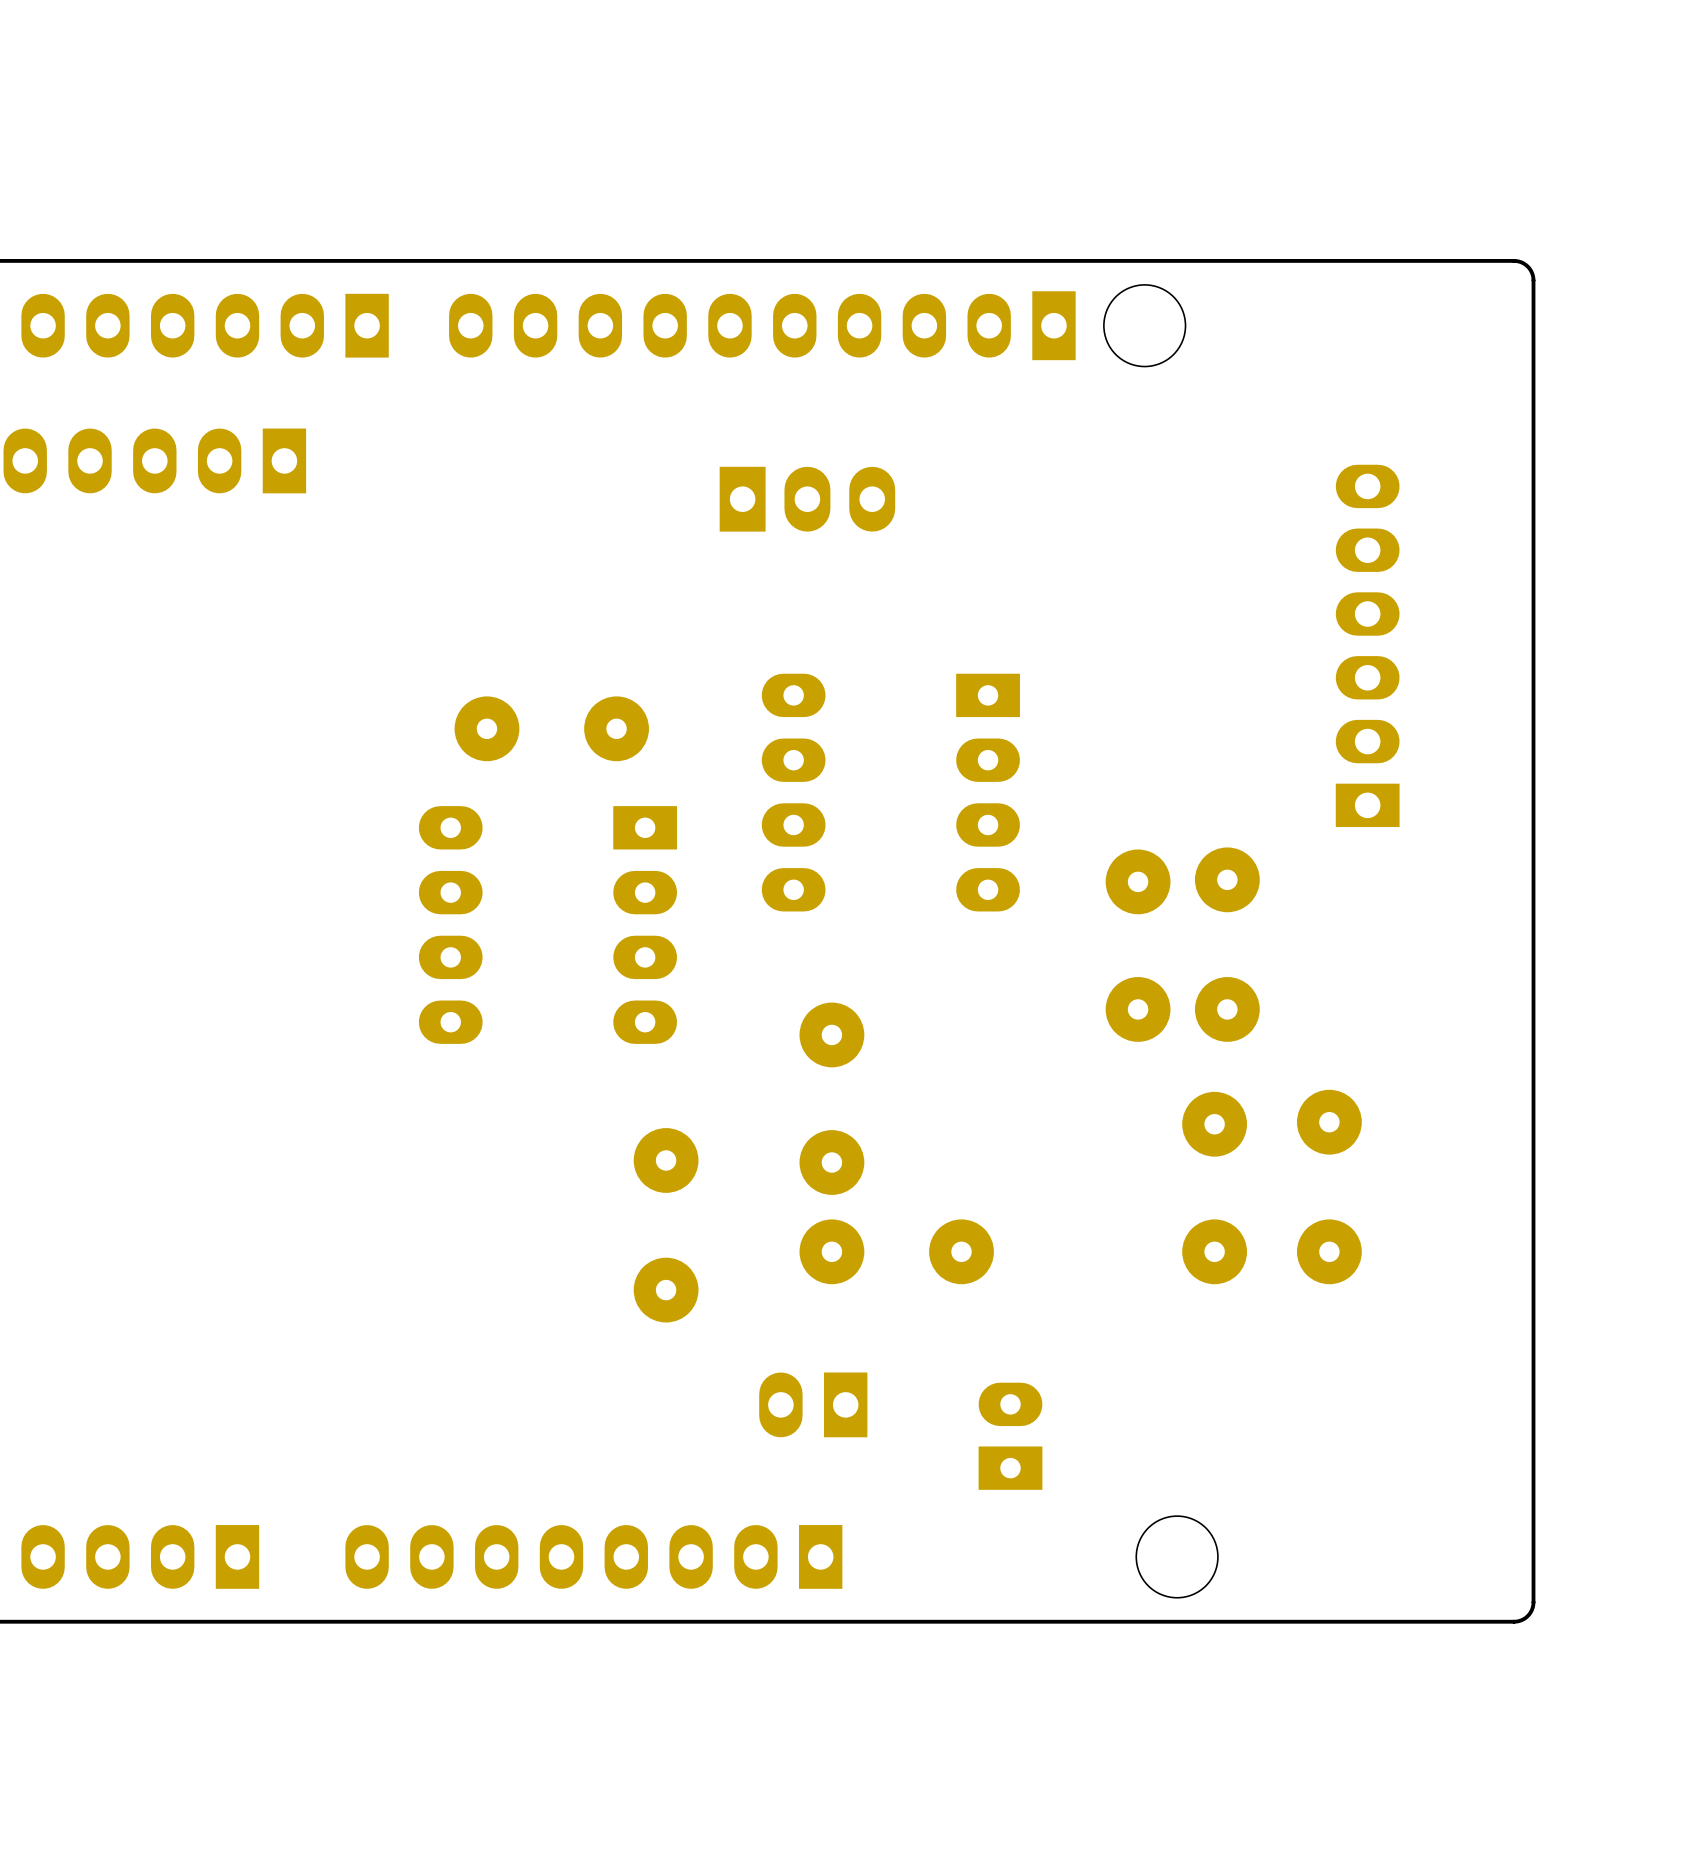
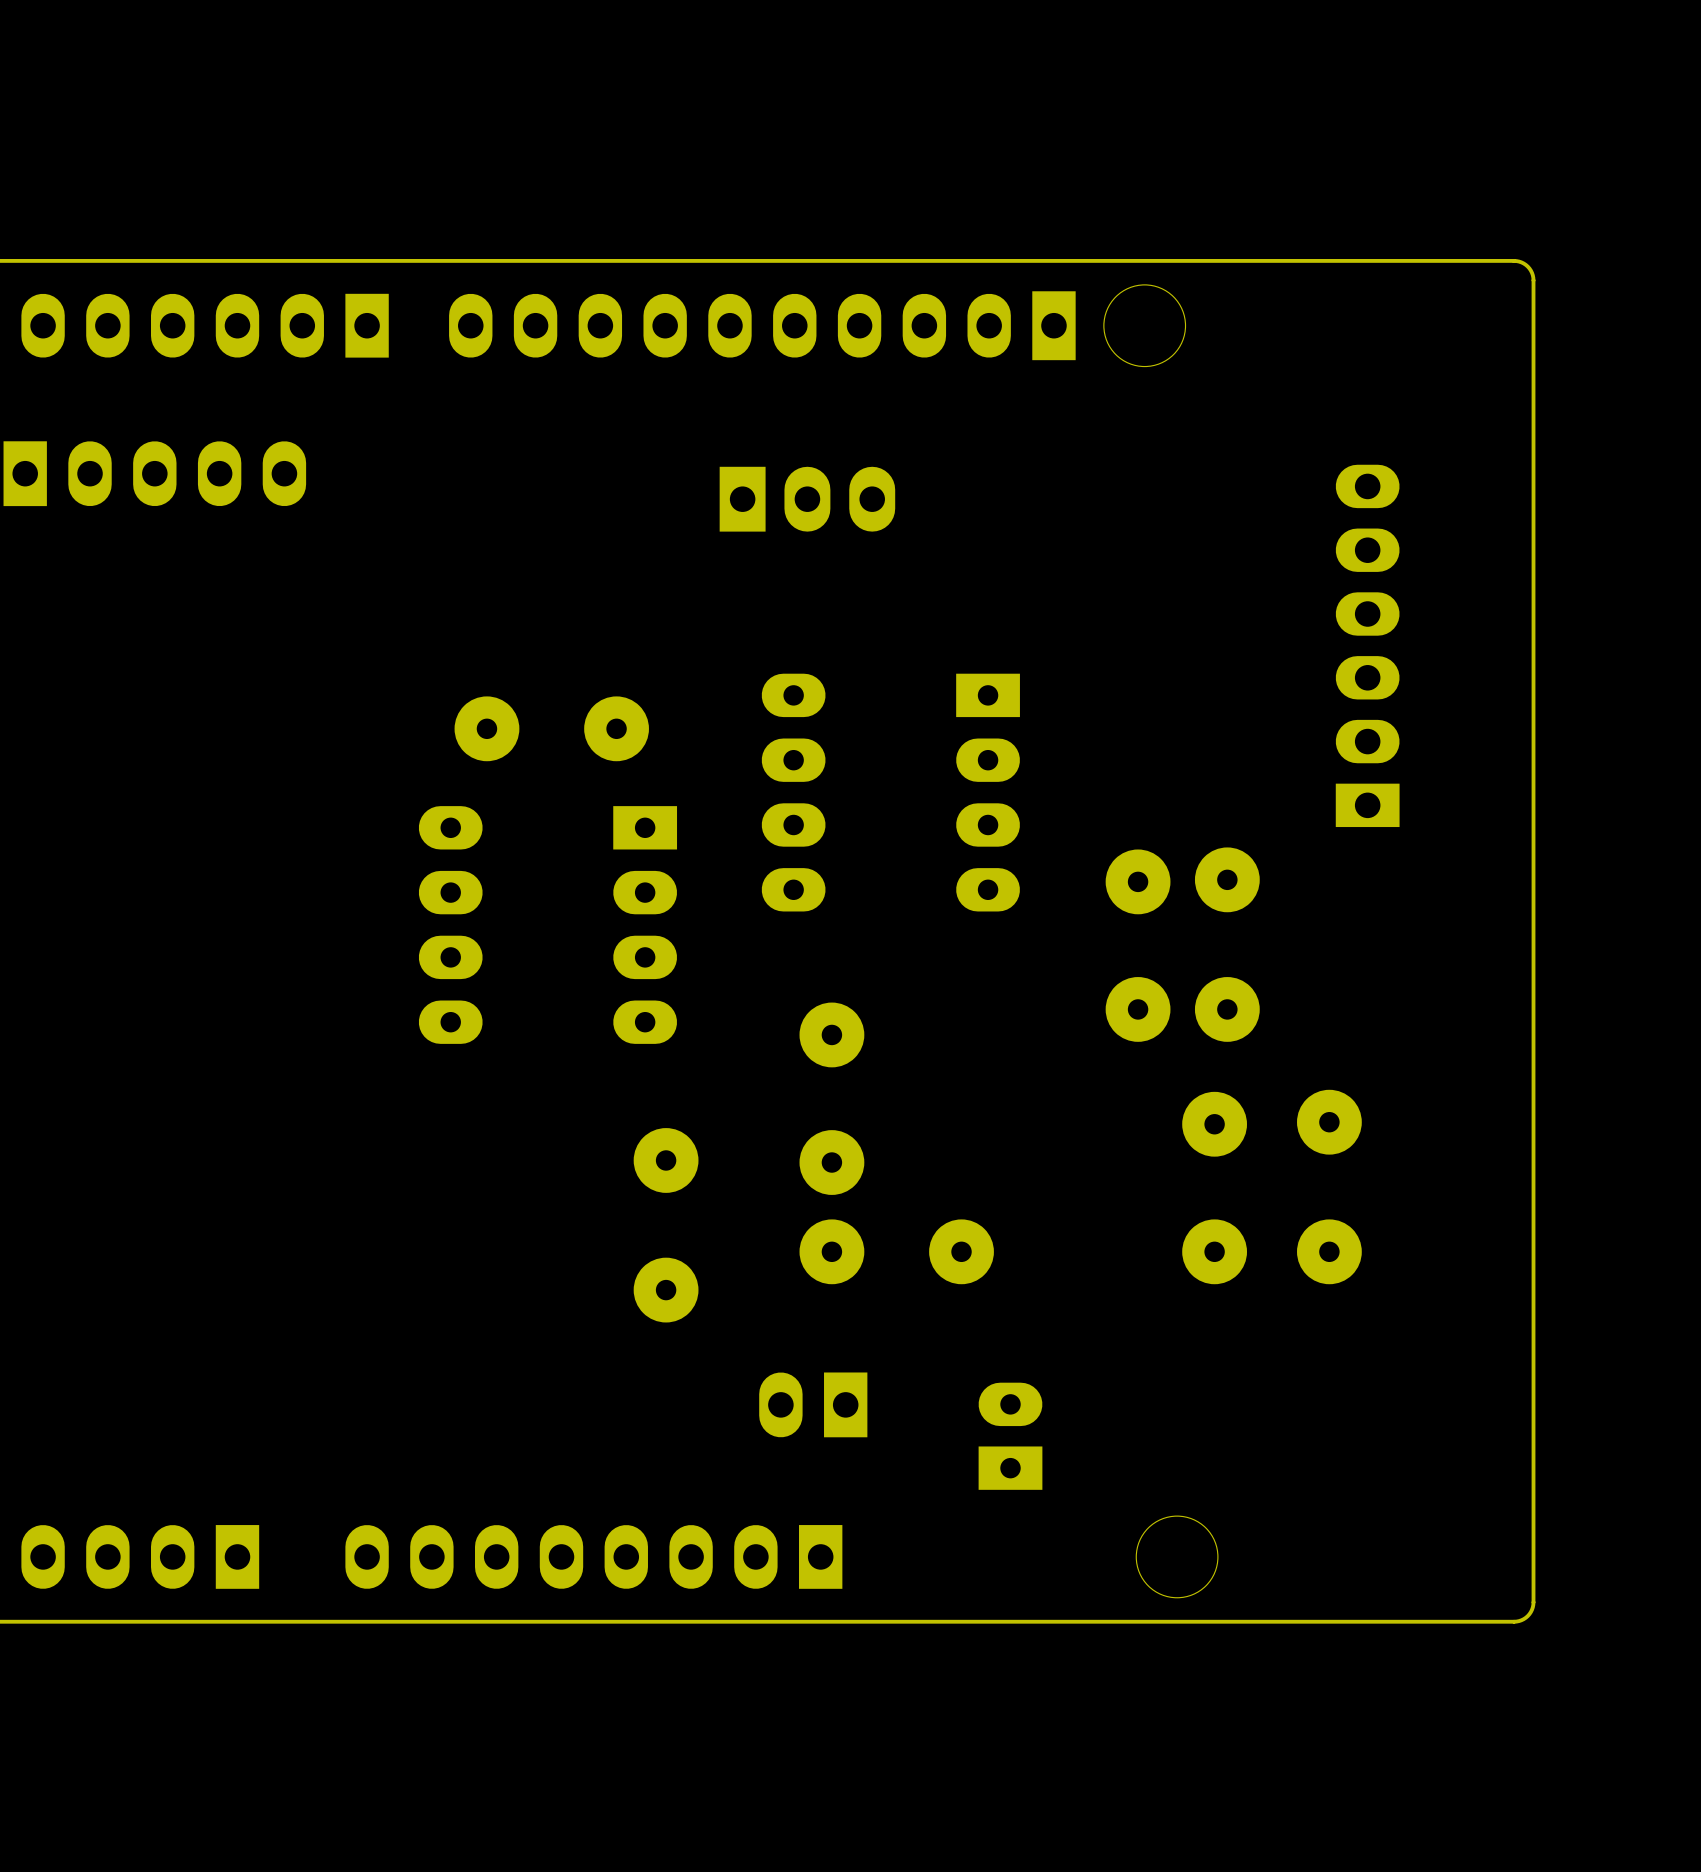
part rotation: 0° (154, 460) -> 180° (154, 473)

